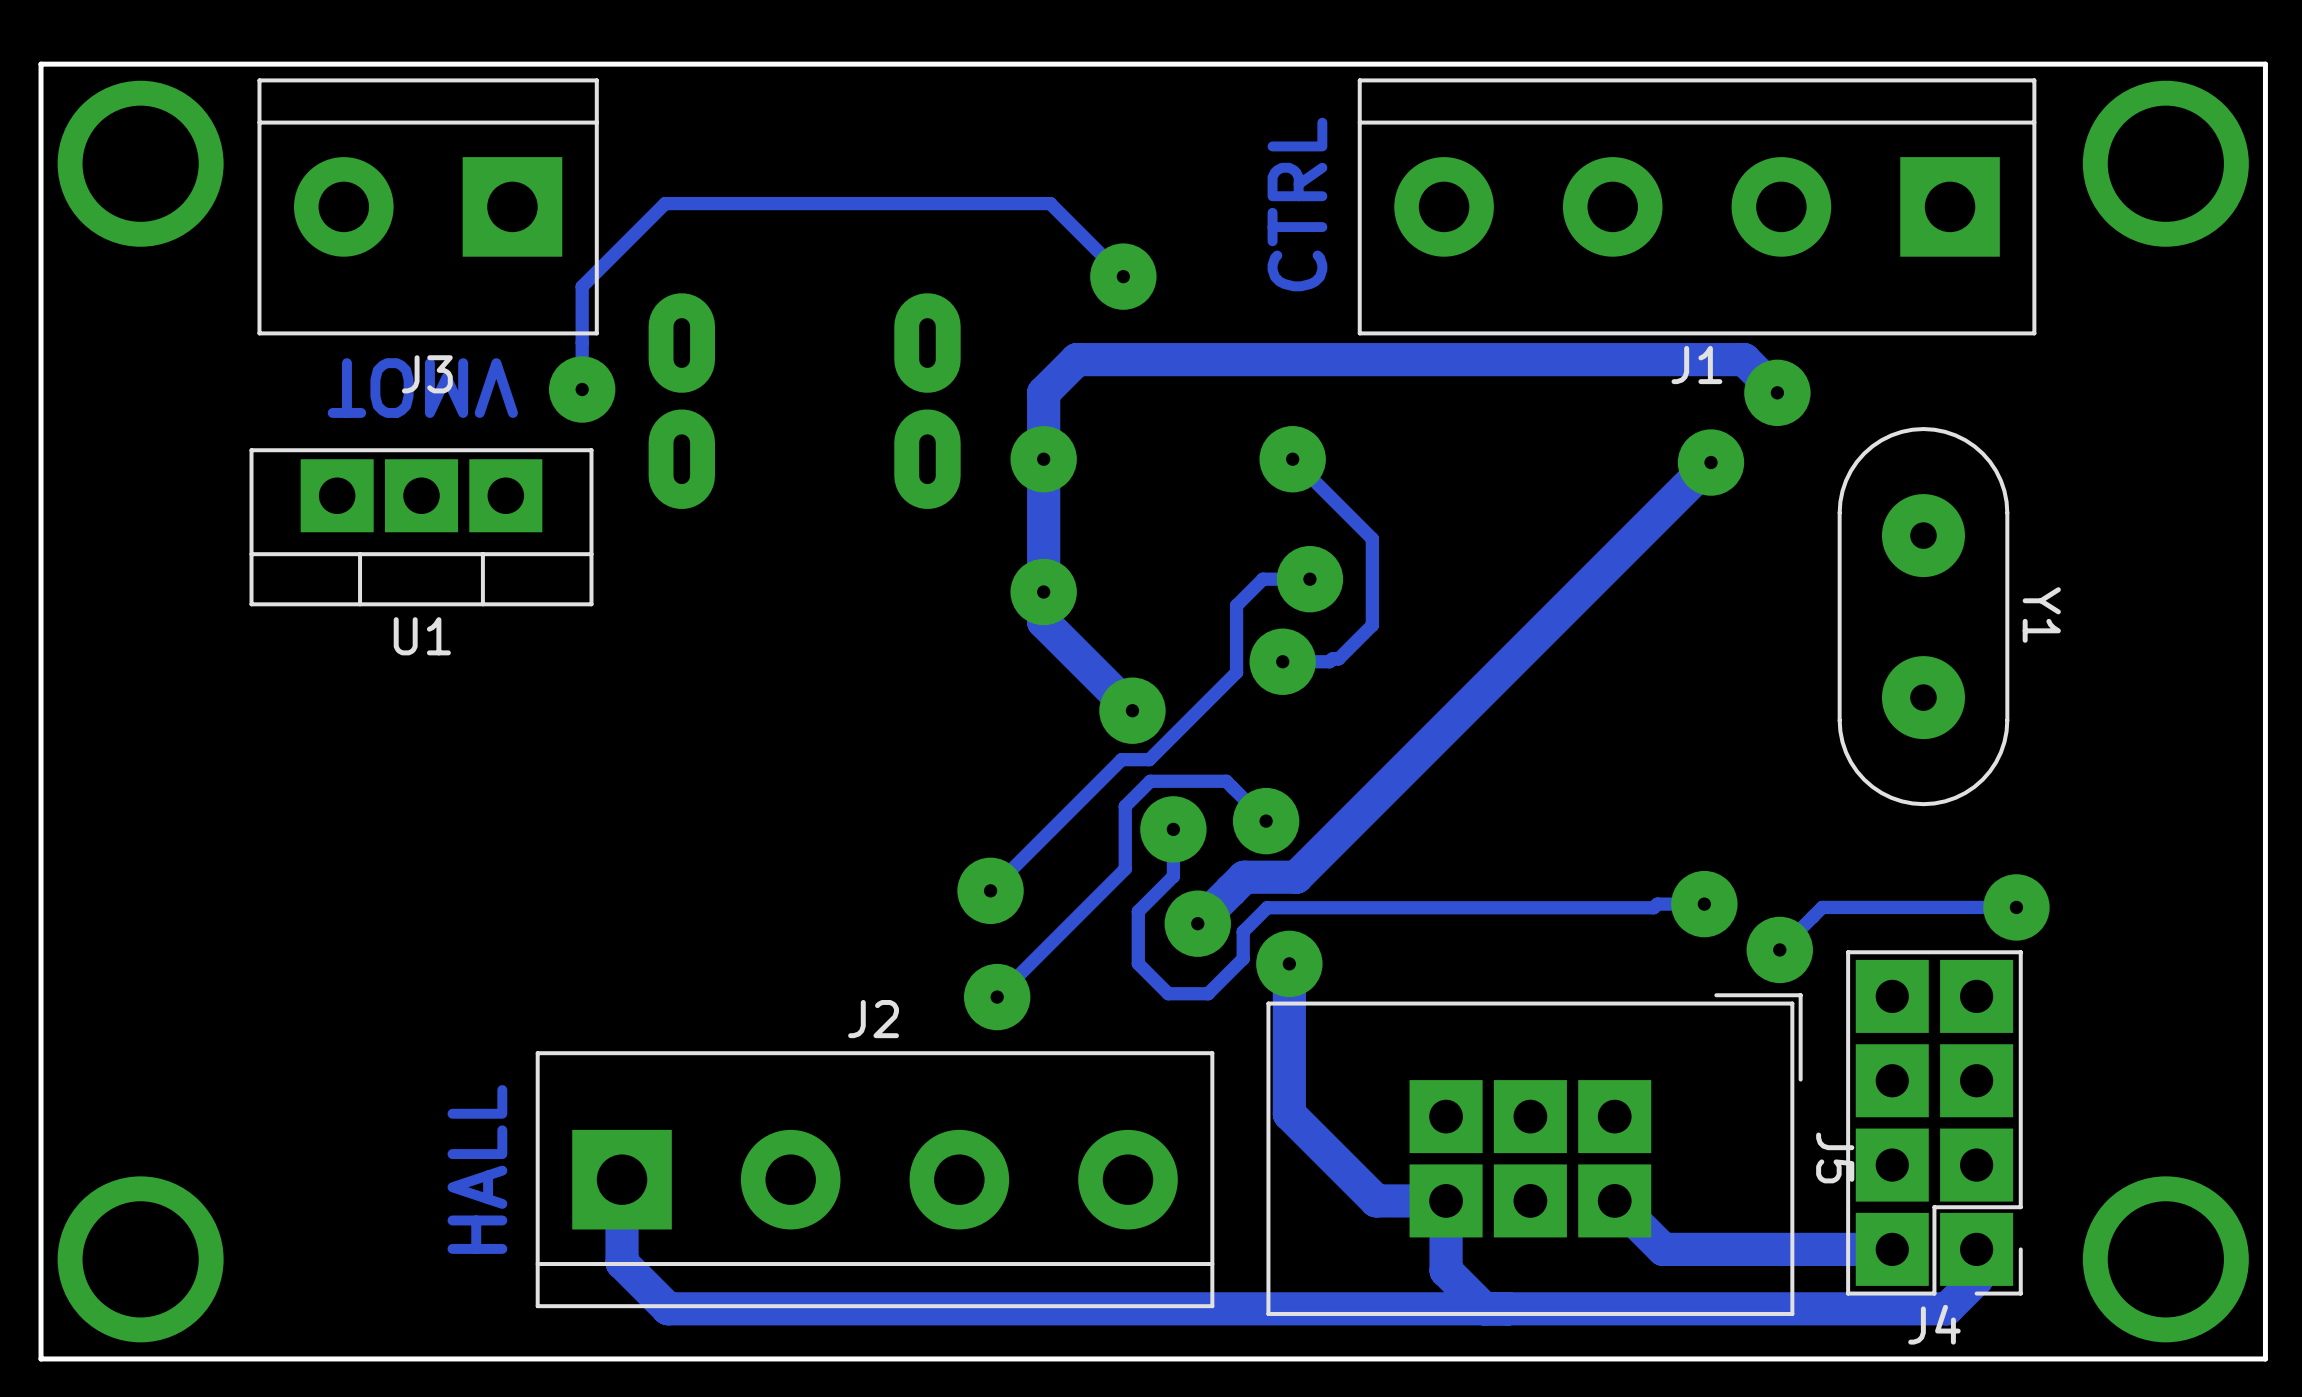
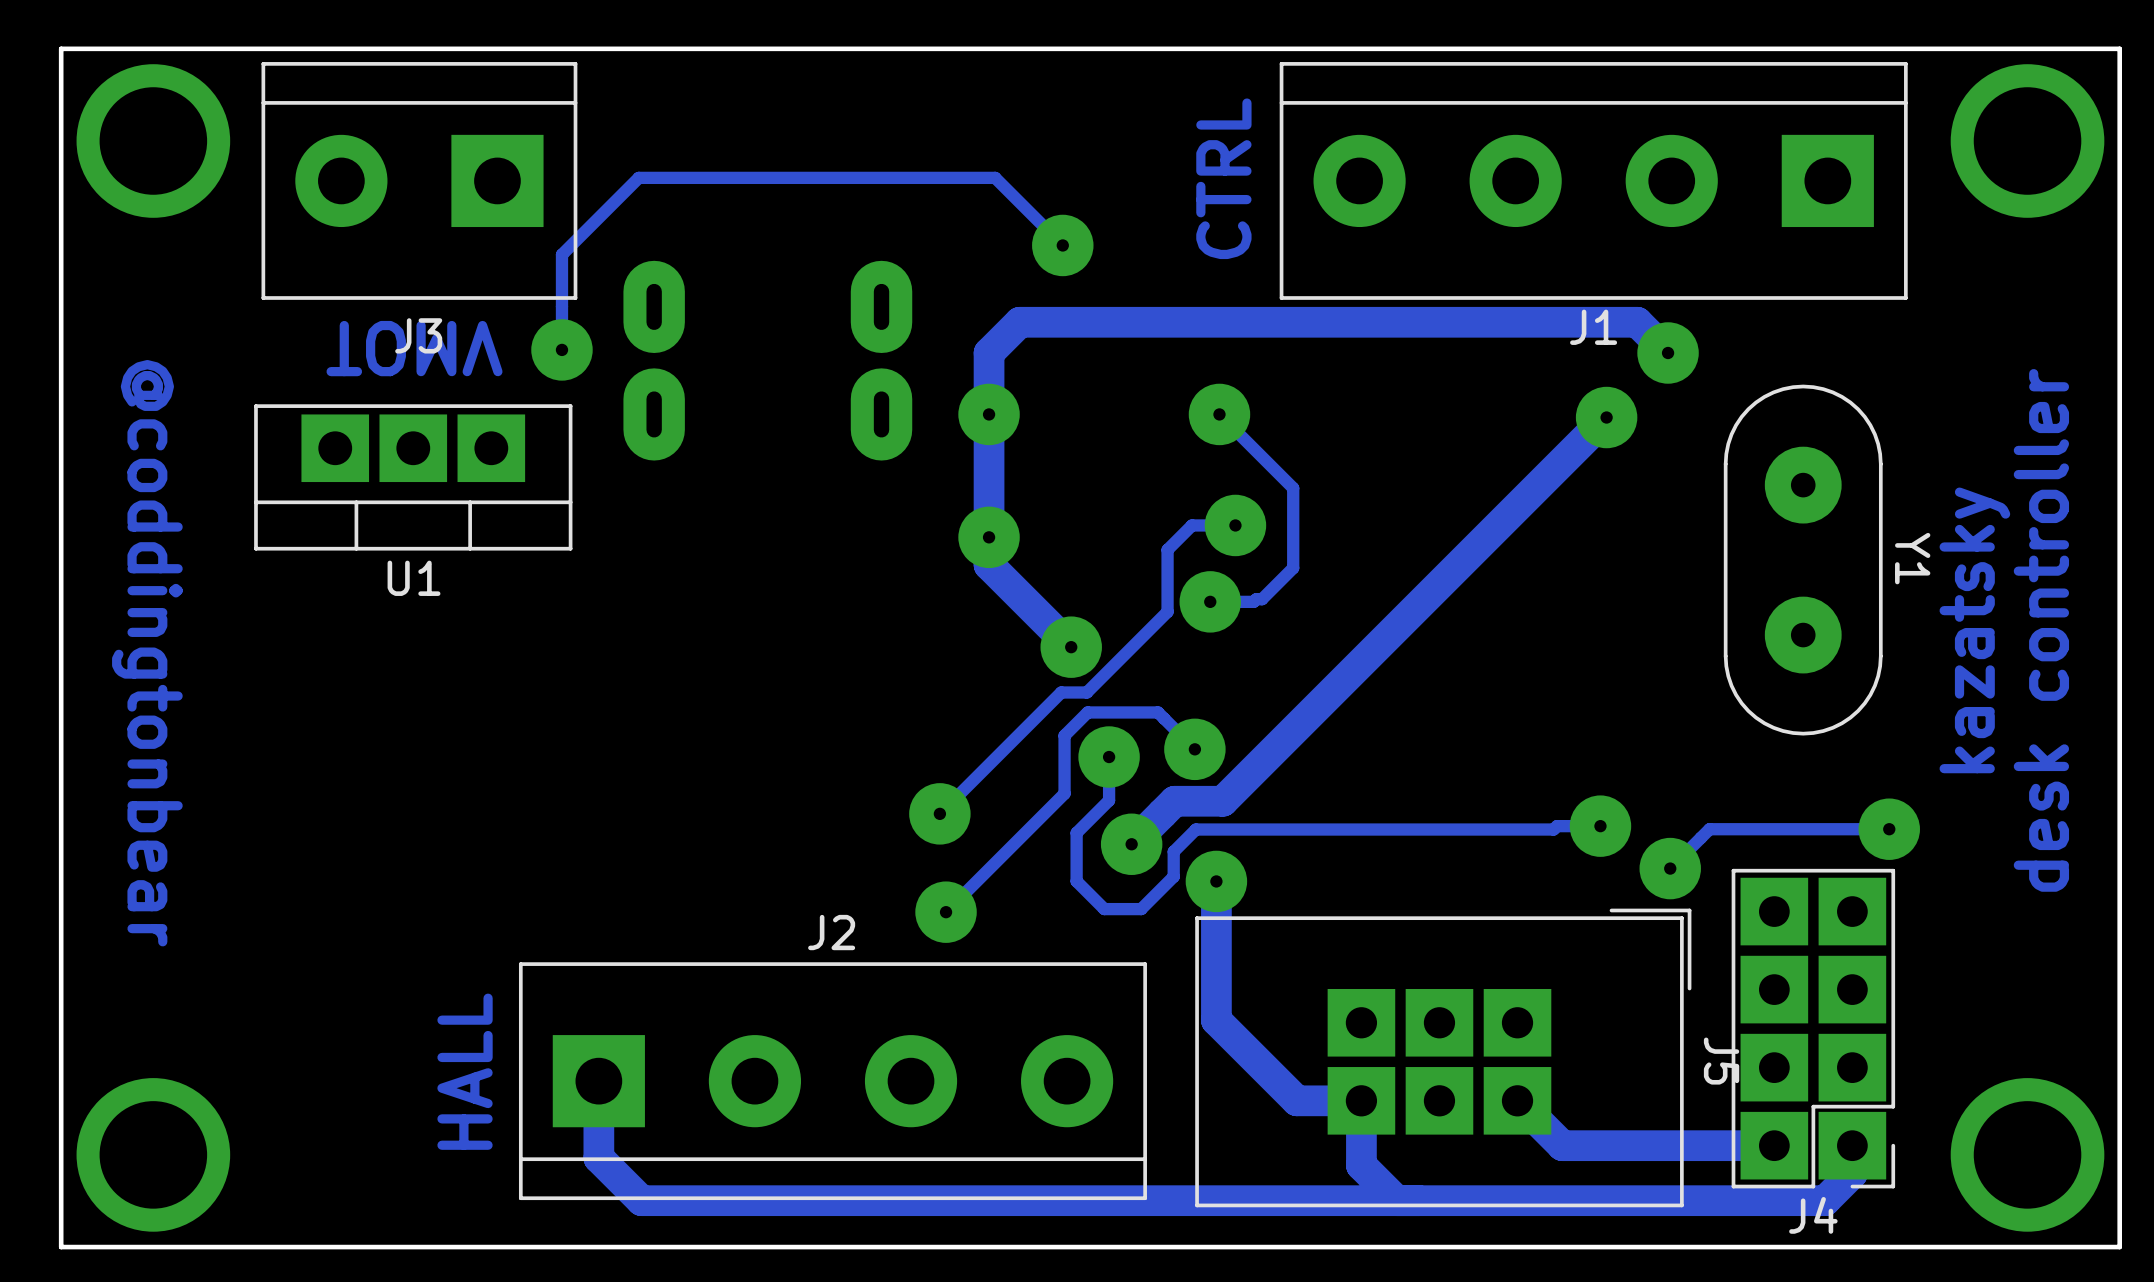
text: none -> kazatsky (1974, 630)
text: none -> desk controller (2041, 630)
text: none -> @coddingtonbear (147, 653)

